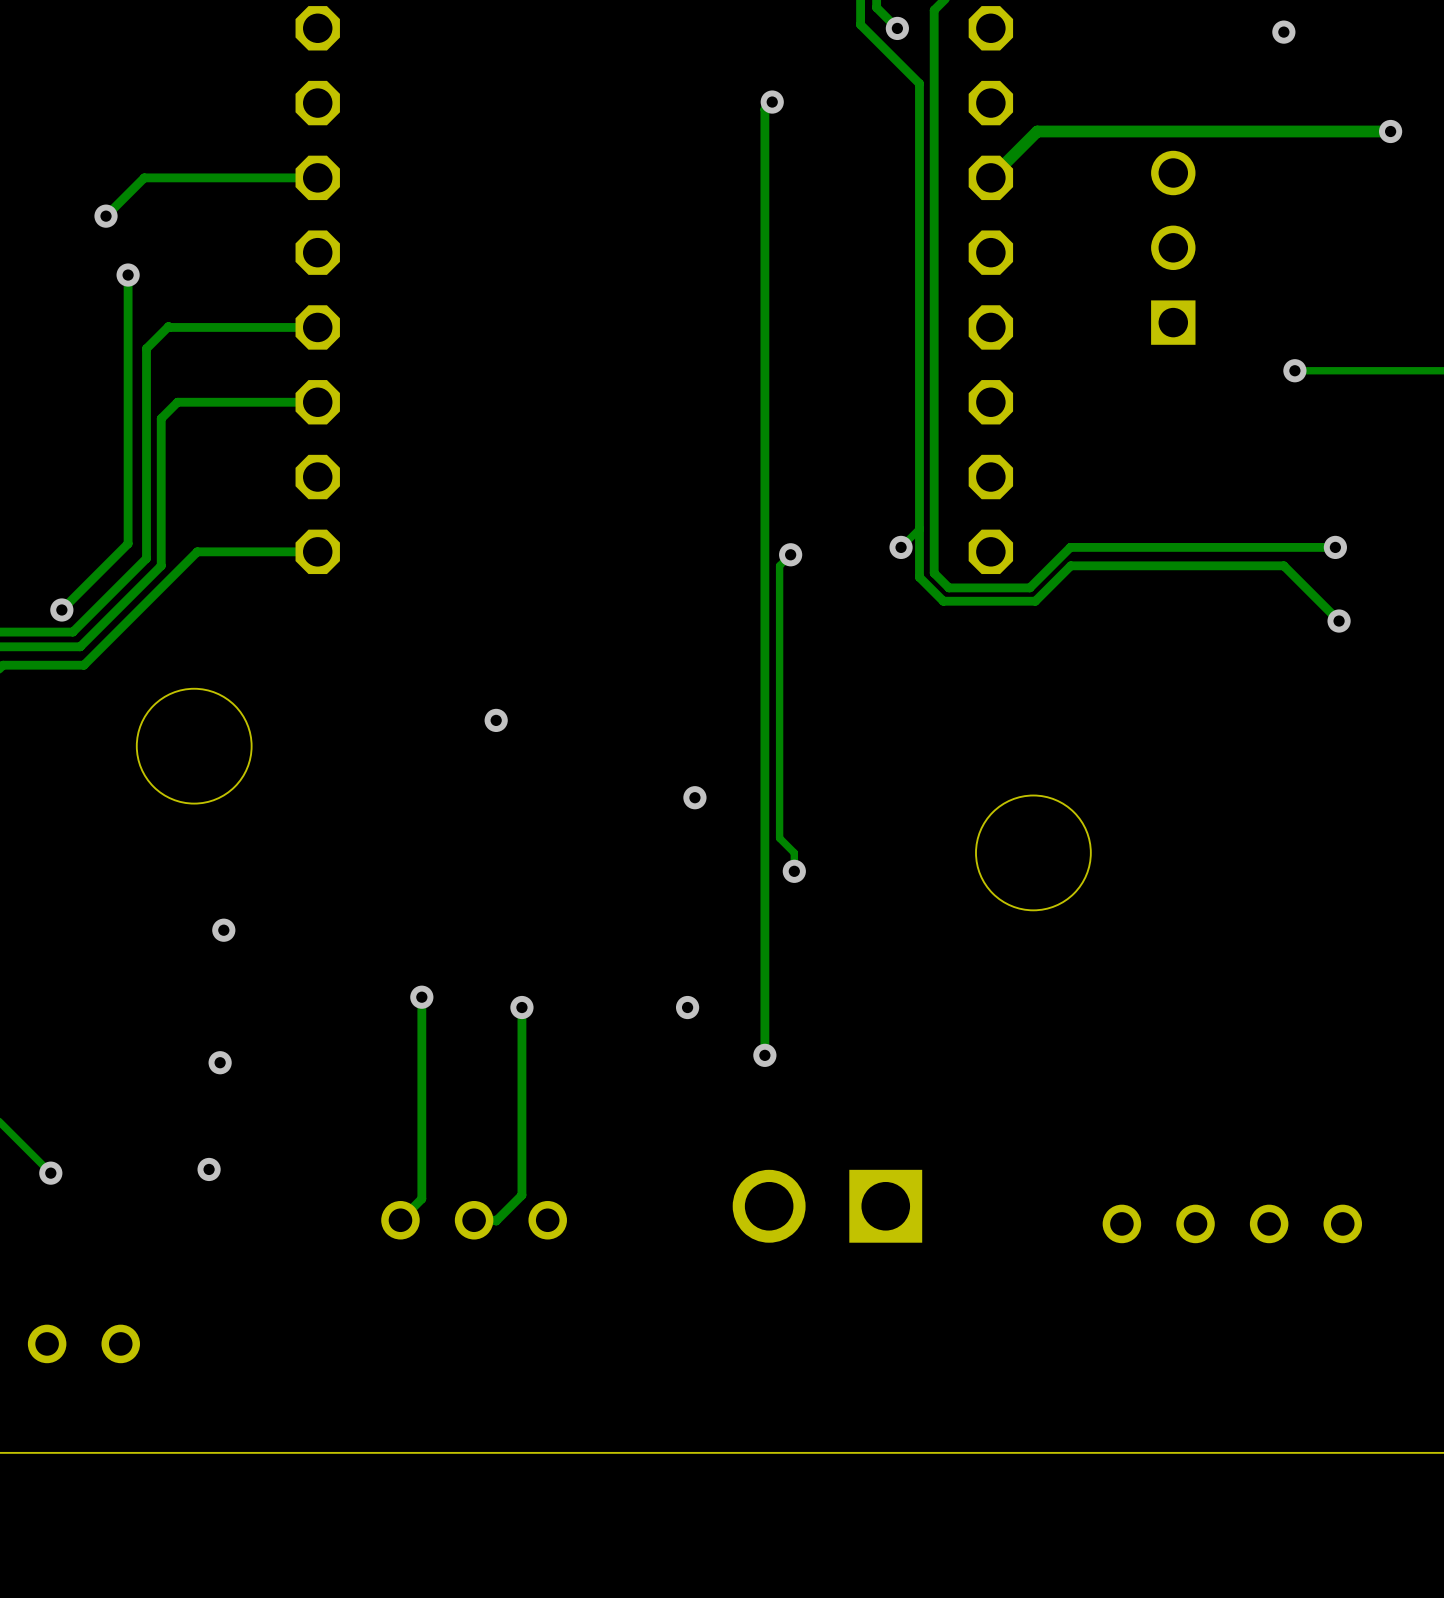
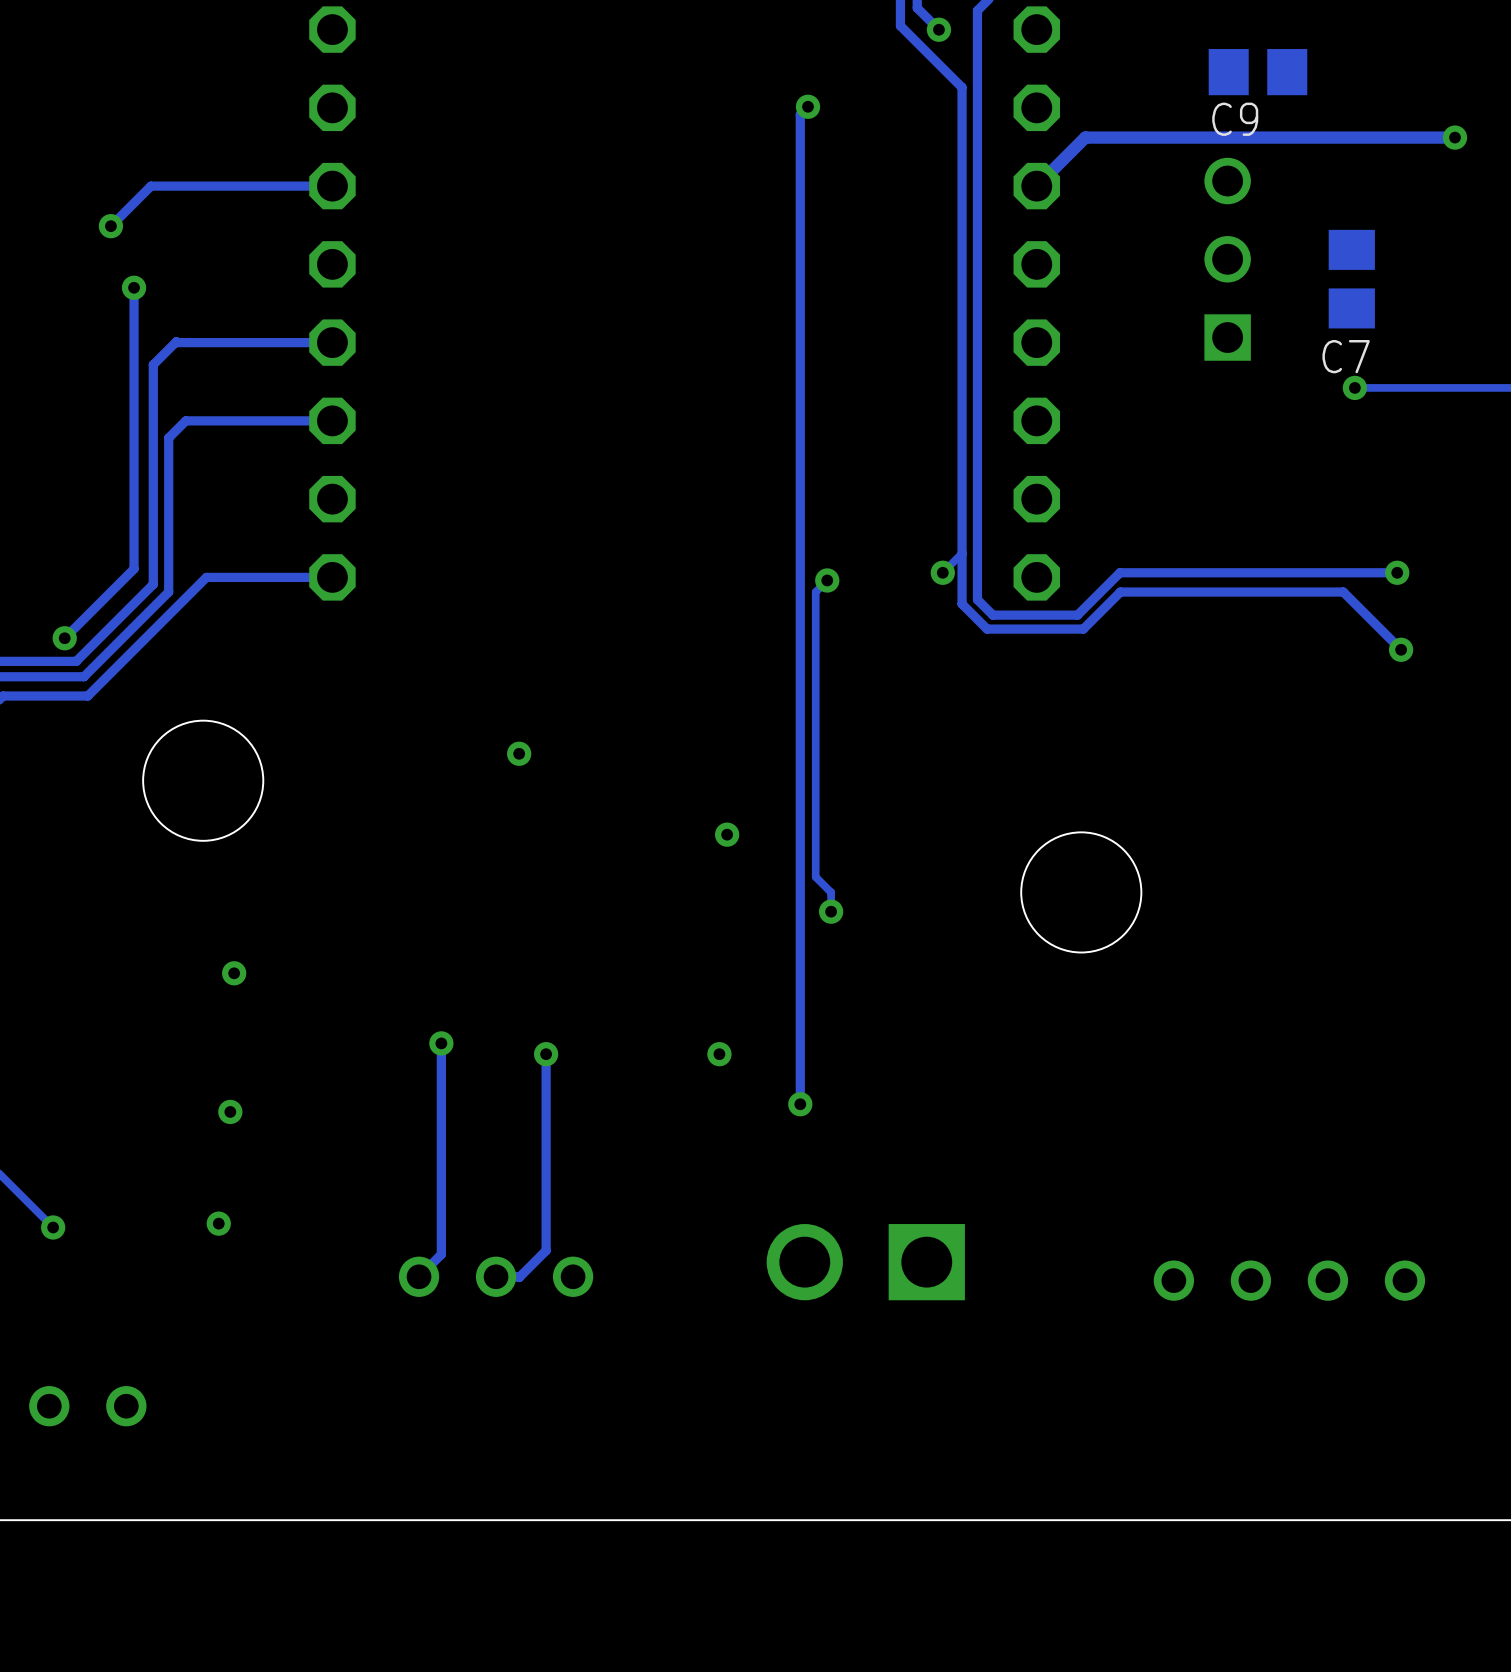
via: (1283, 32) -> none
C9: none -> (1257, 72)
C7: none -> (1351, 279)

